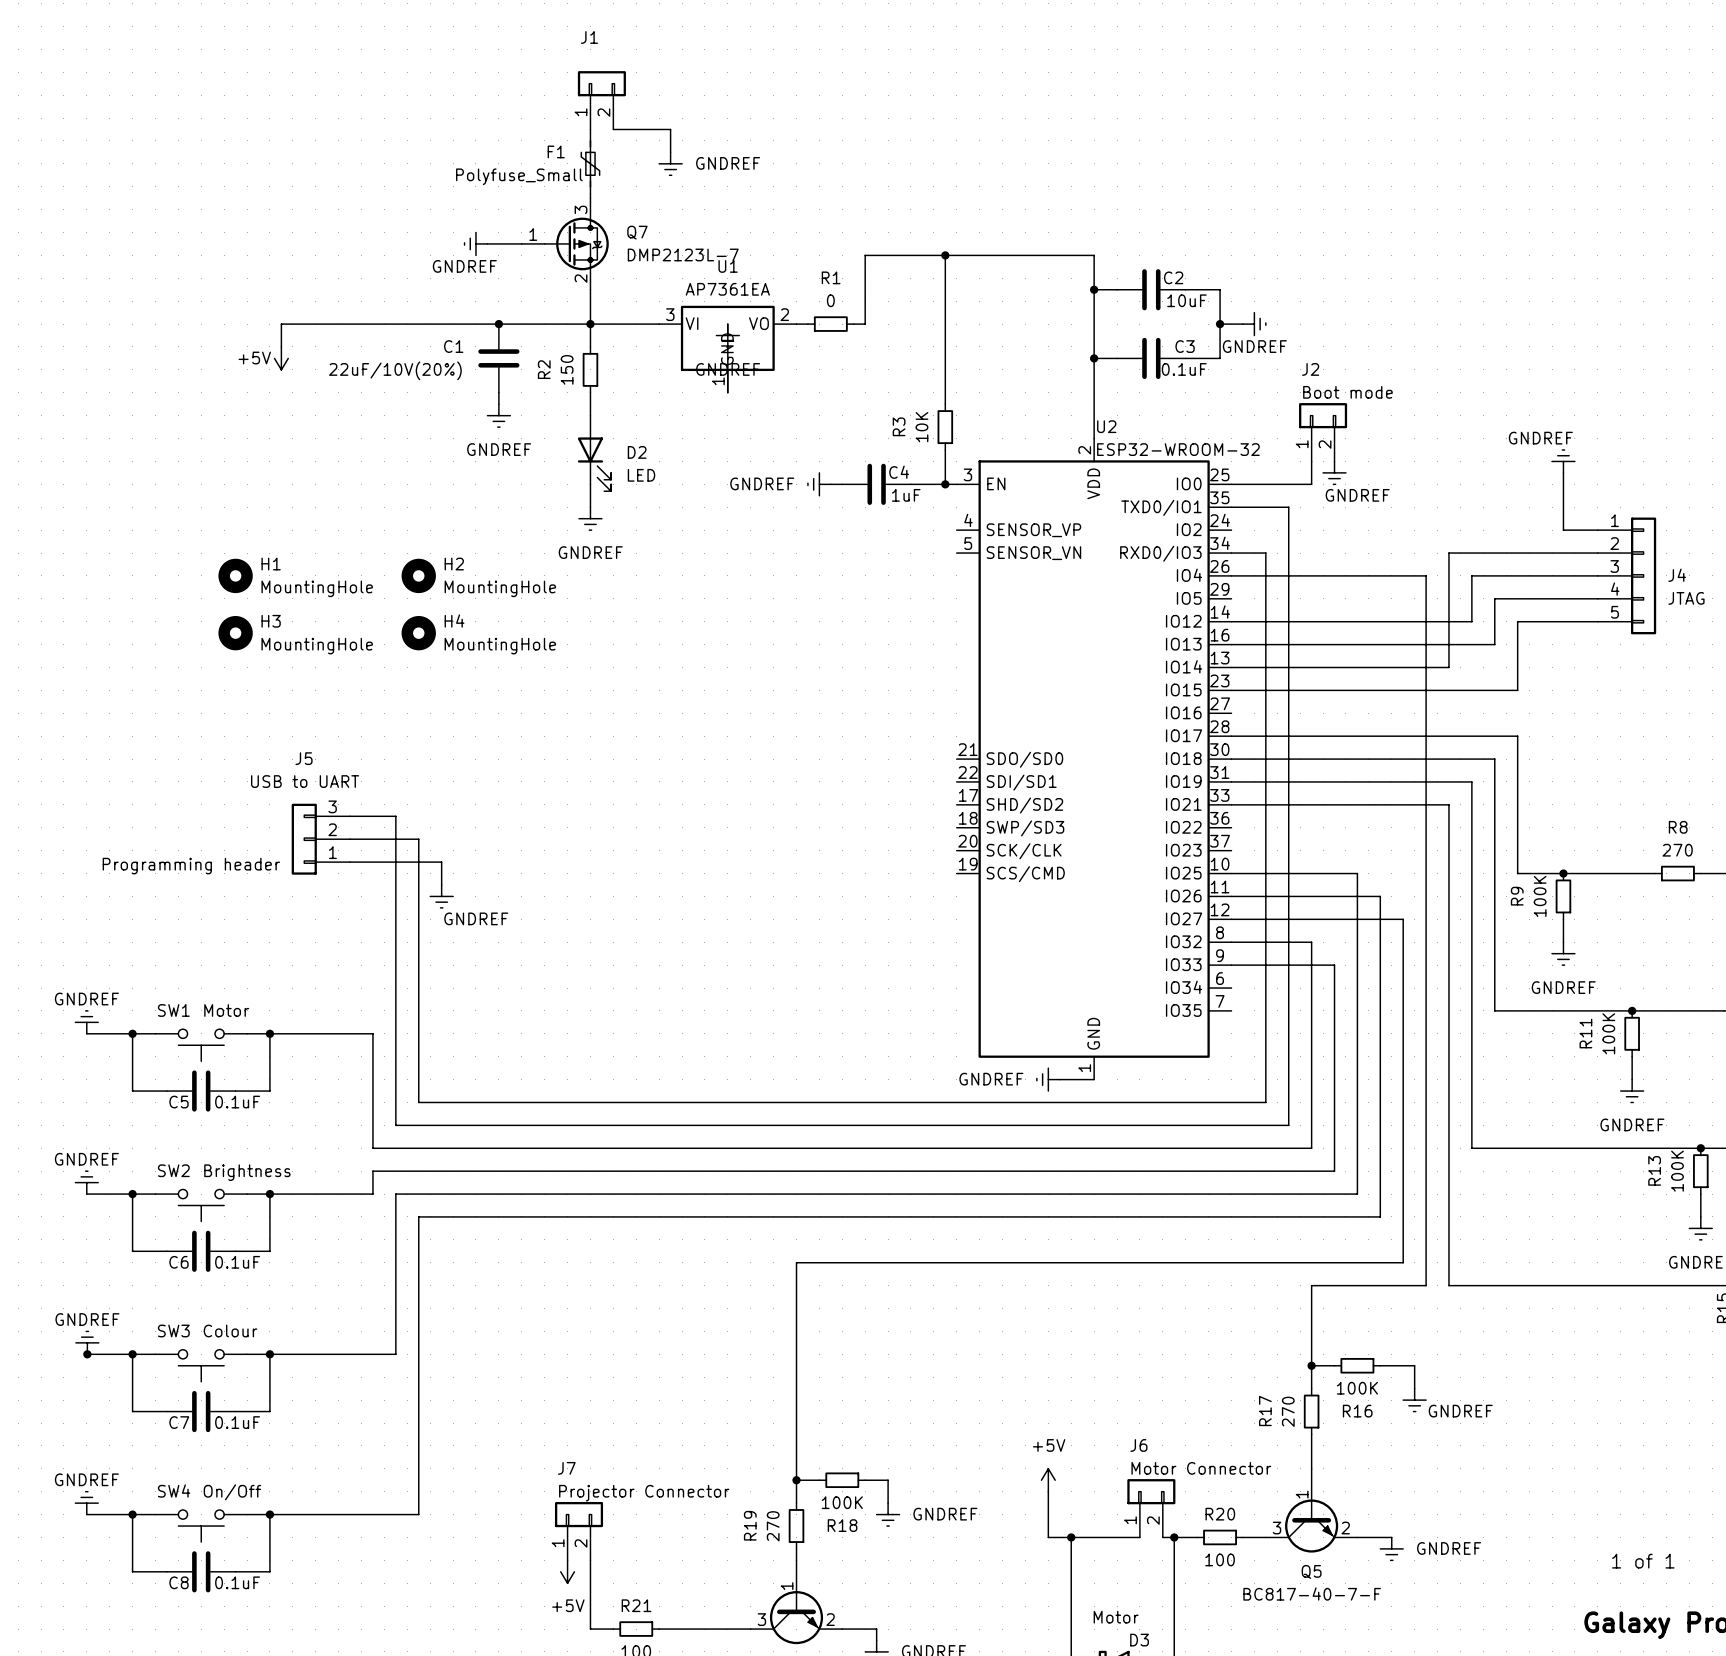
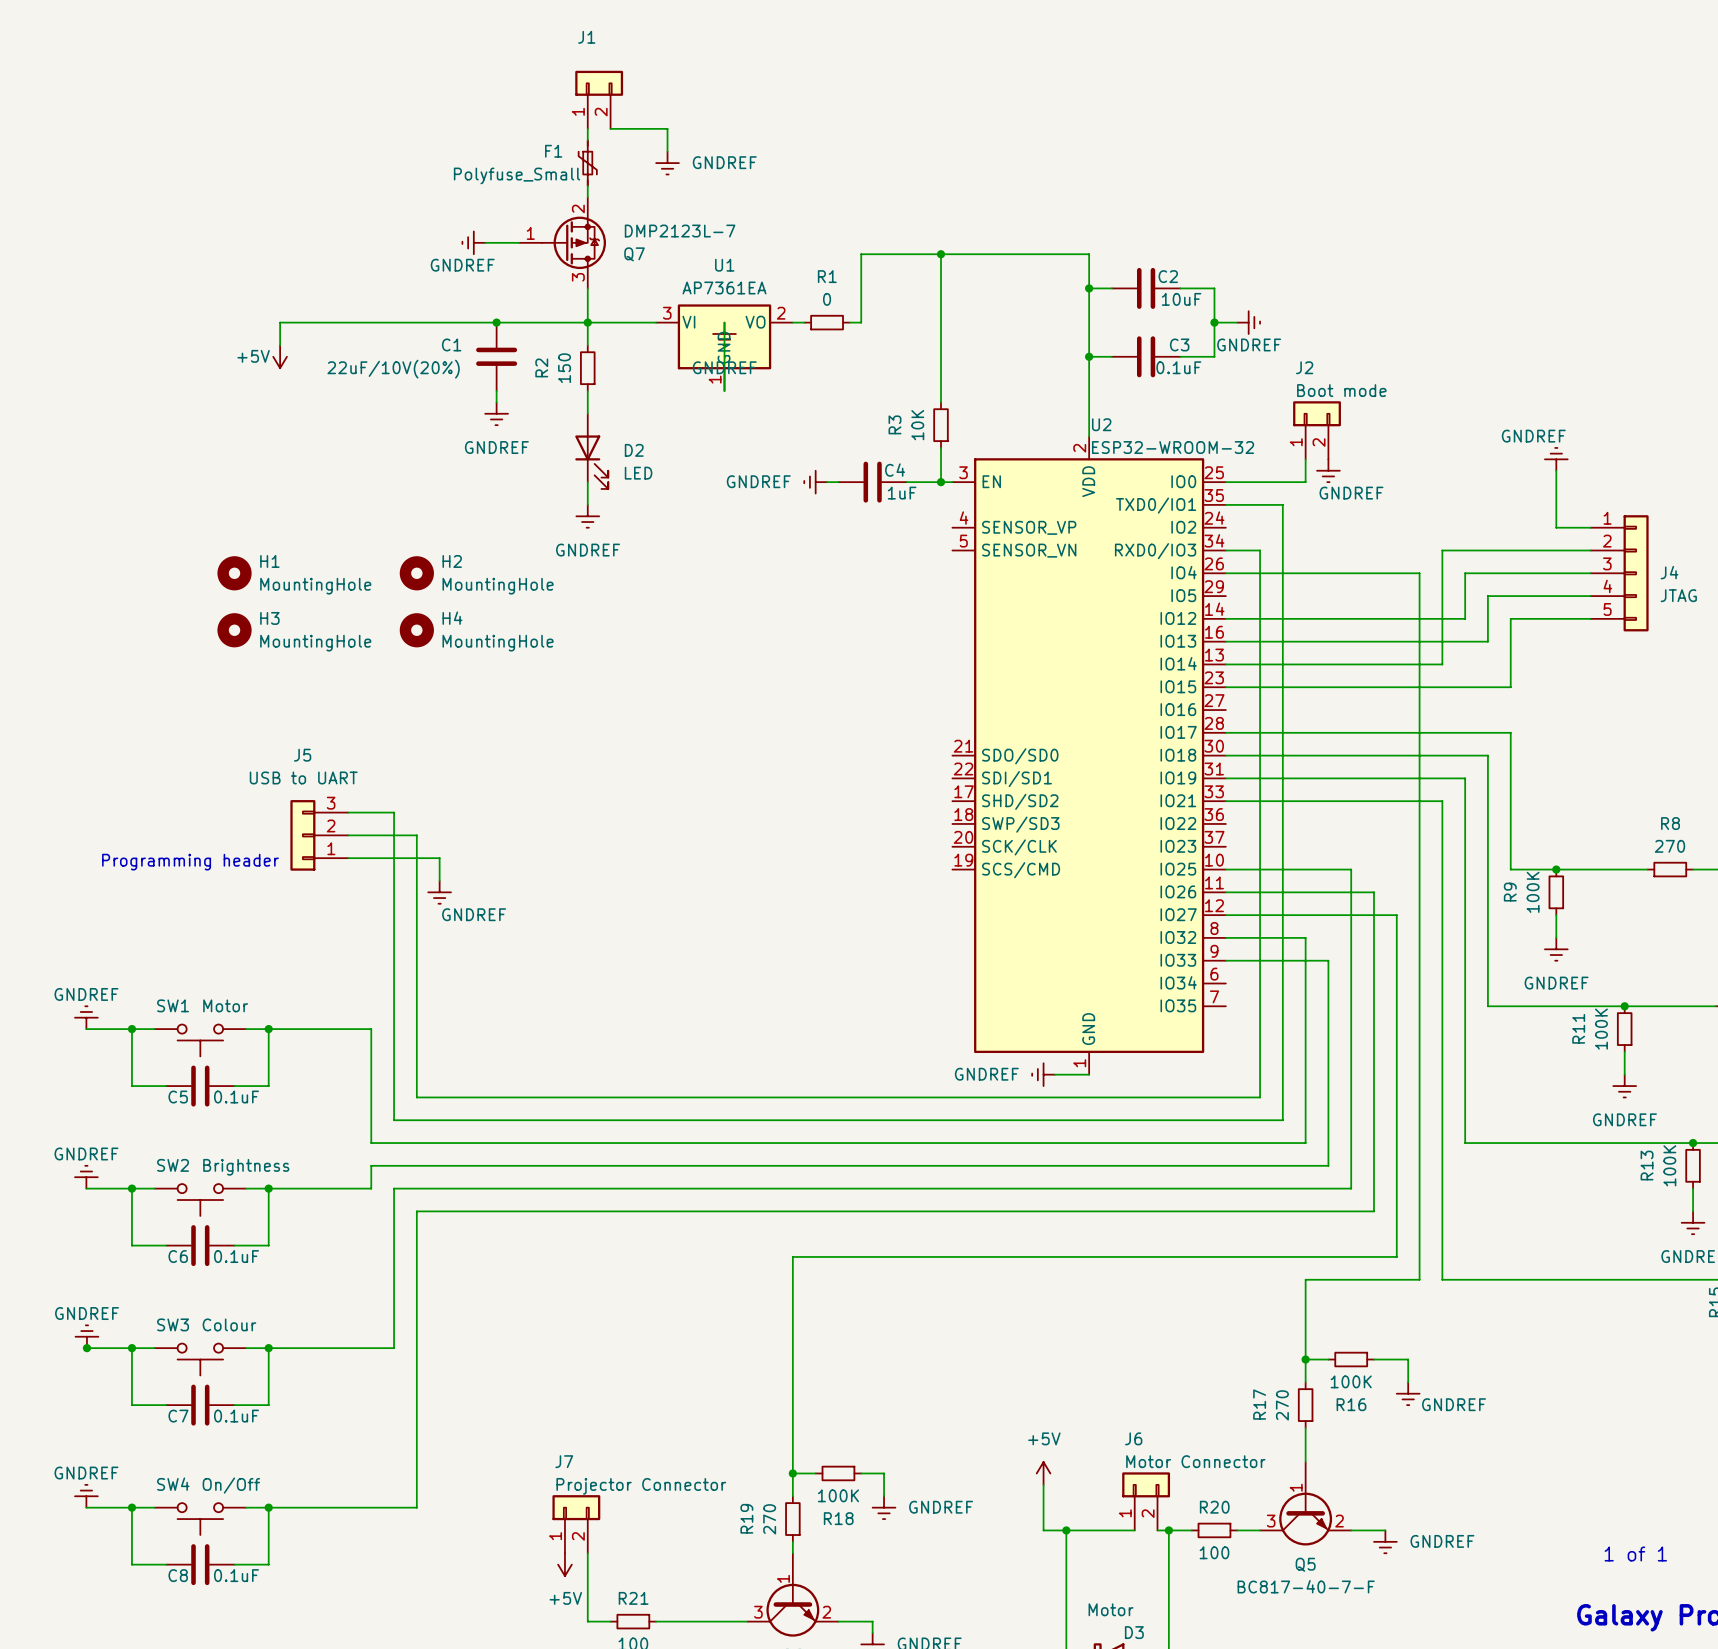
Q7 flip: as is (576, 243) -> up-down (574, 242)

